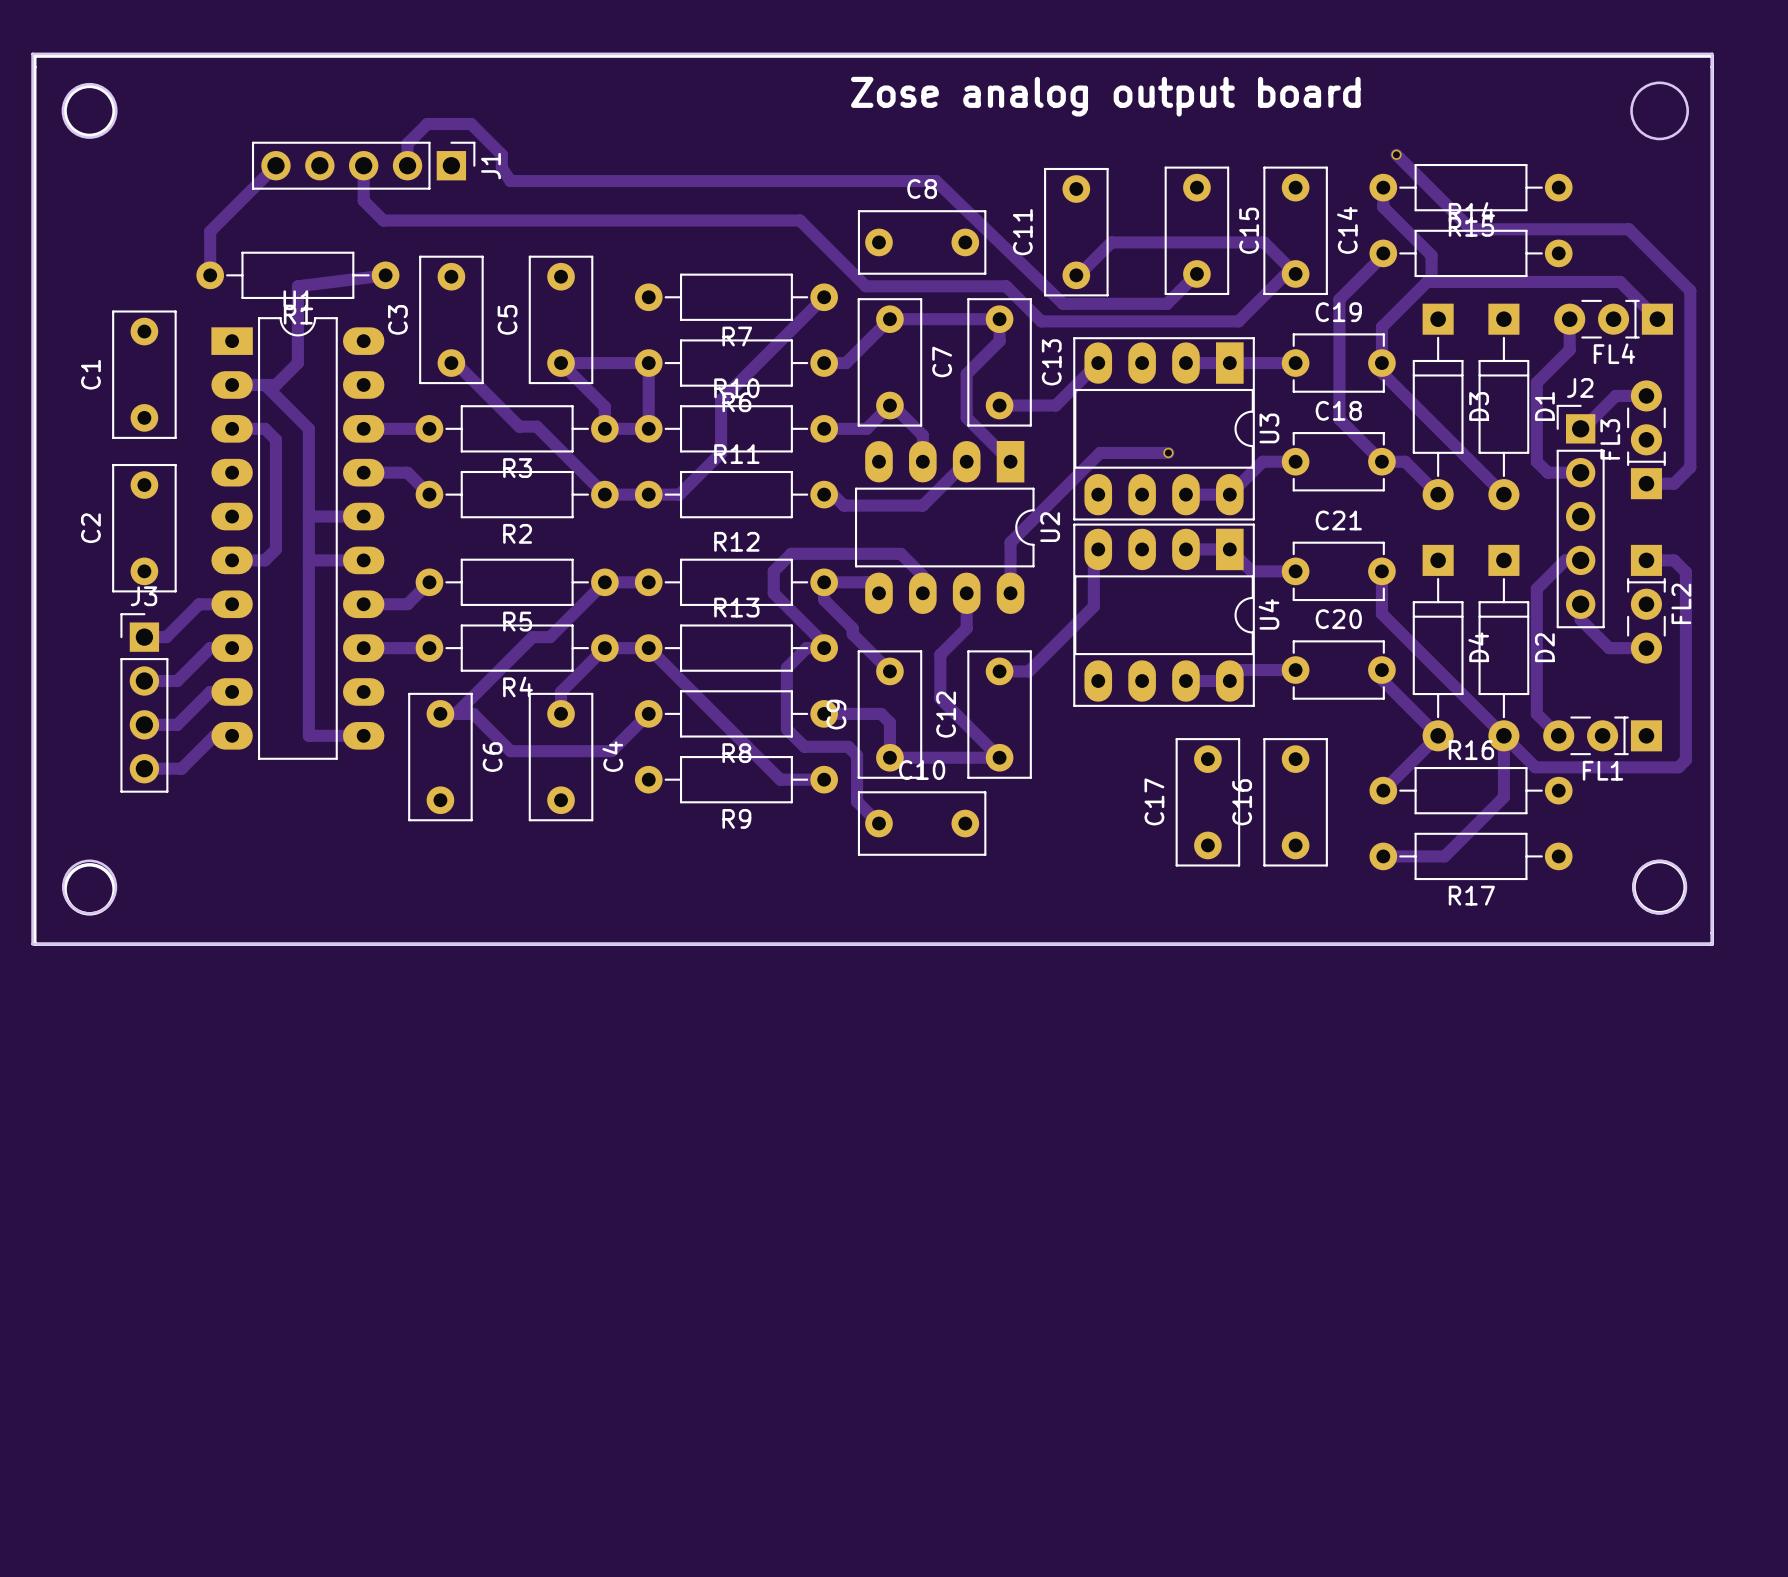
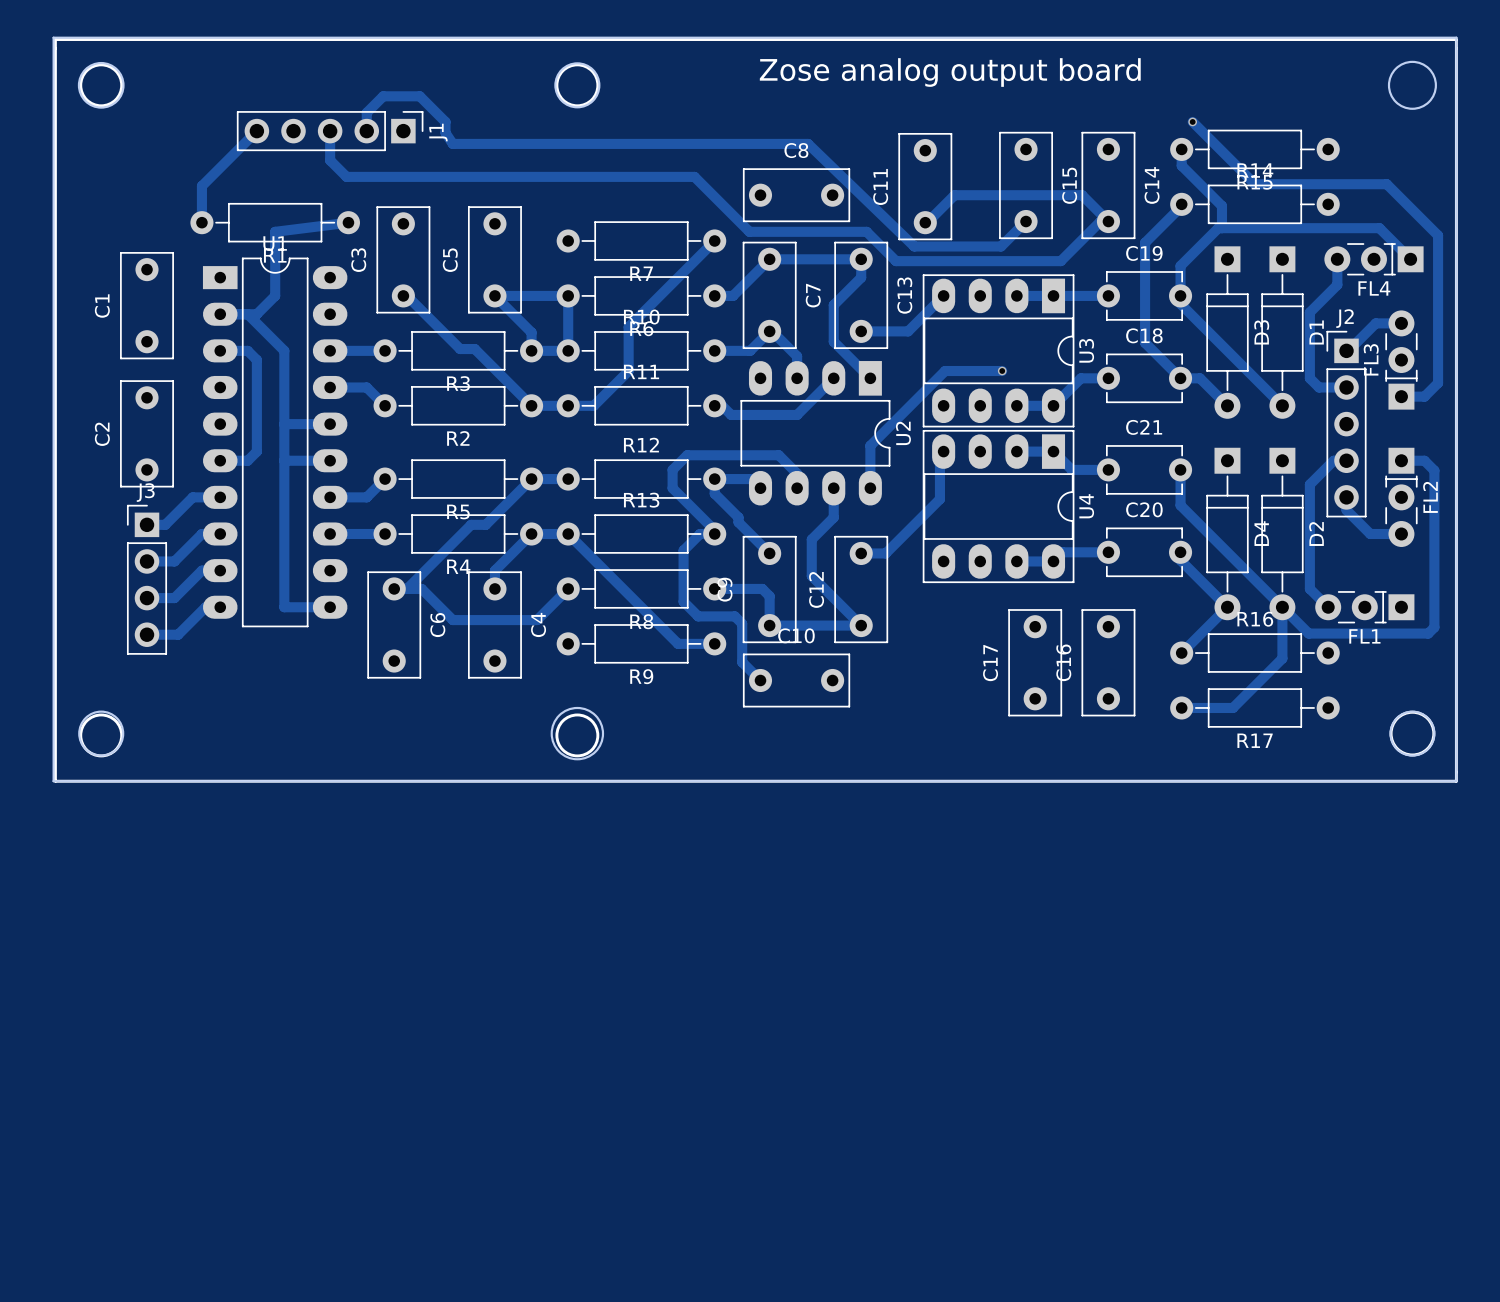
round board edge: none -> [554, 62, 601, 109]
drawing: none -> [555, 63, 600, 108]
round board edge: none -> [550, 706, 605, 761]
drawing: none -> [555, 713, 600, 758]

